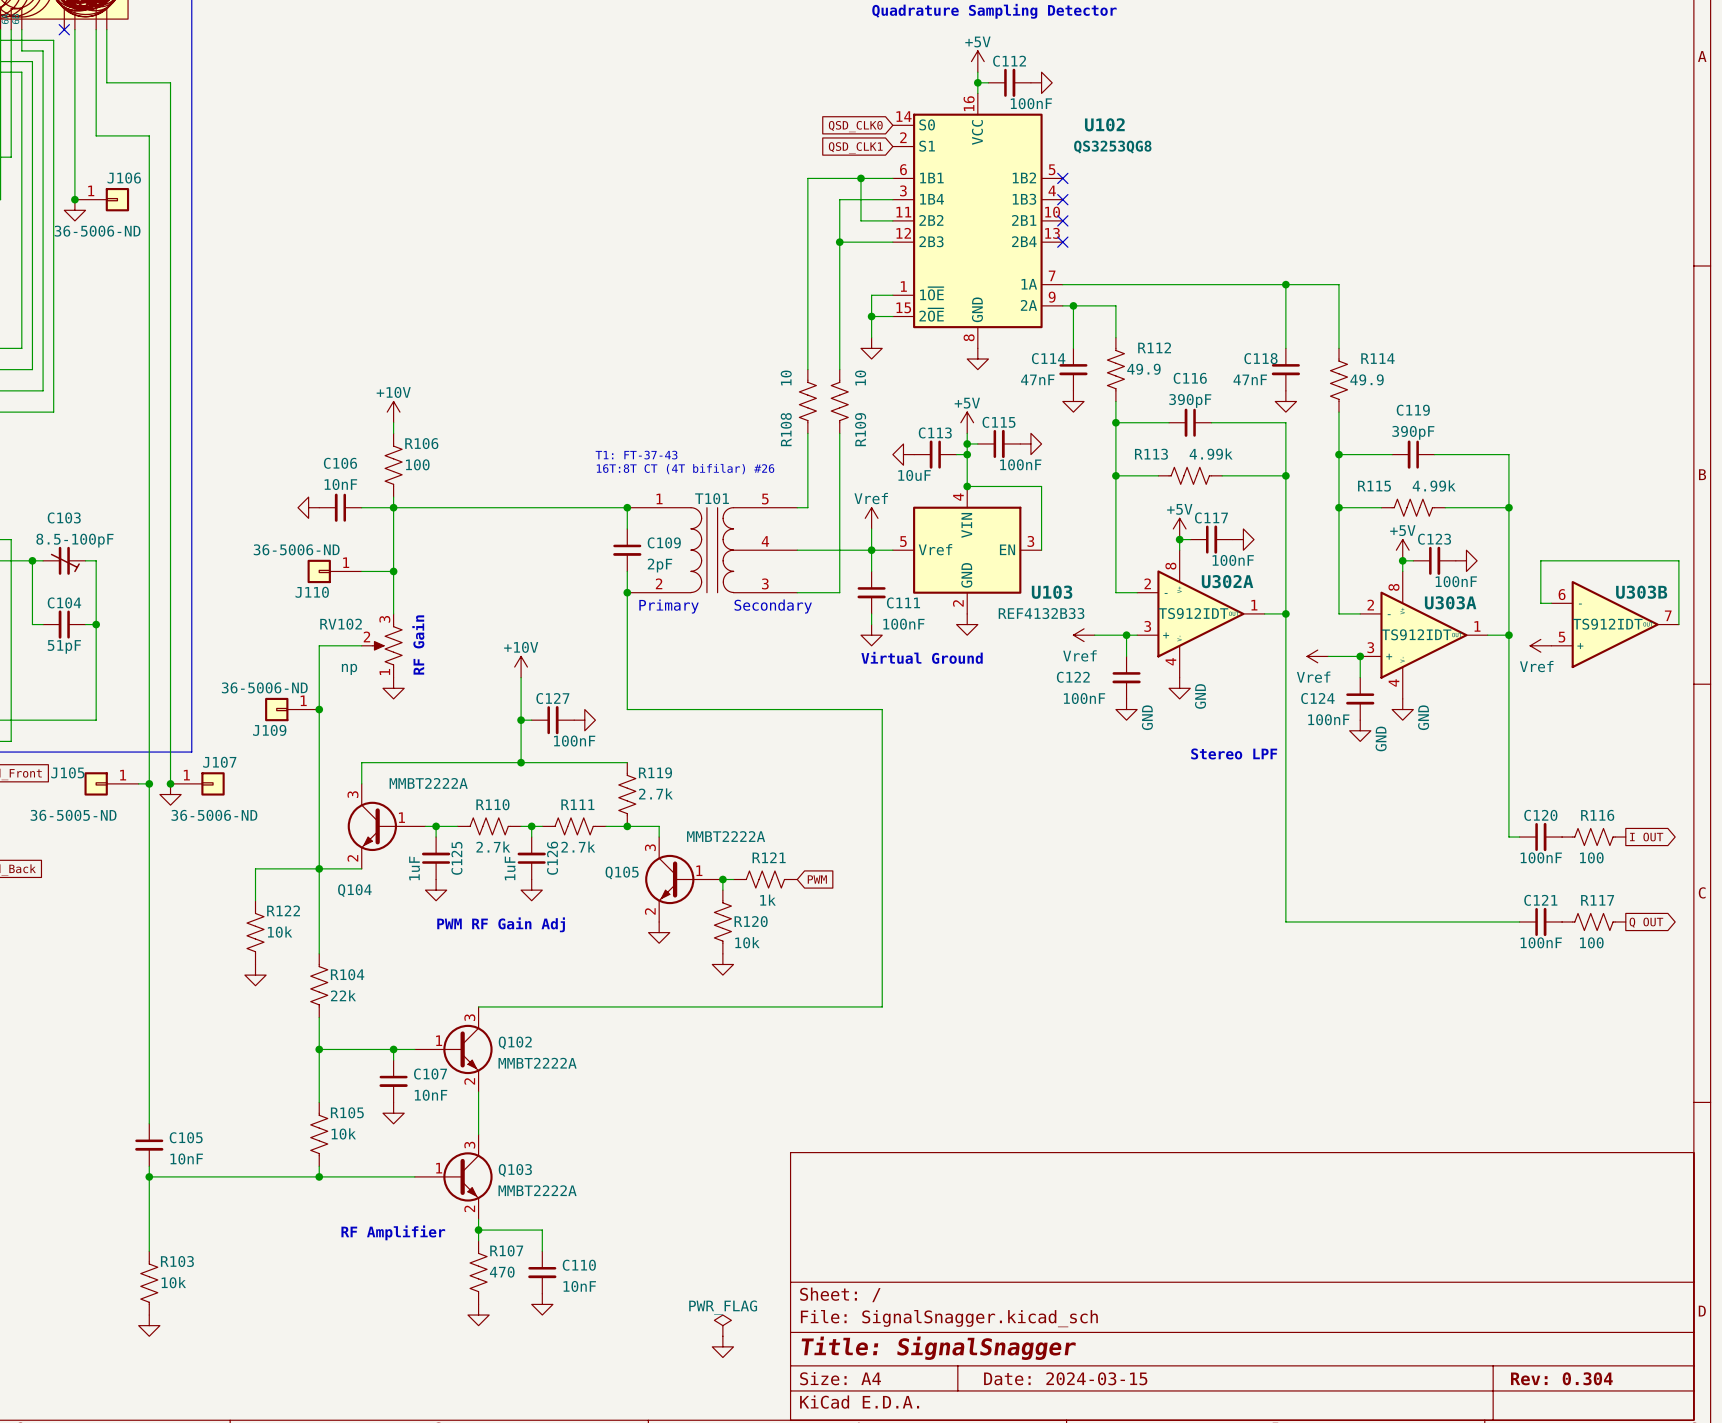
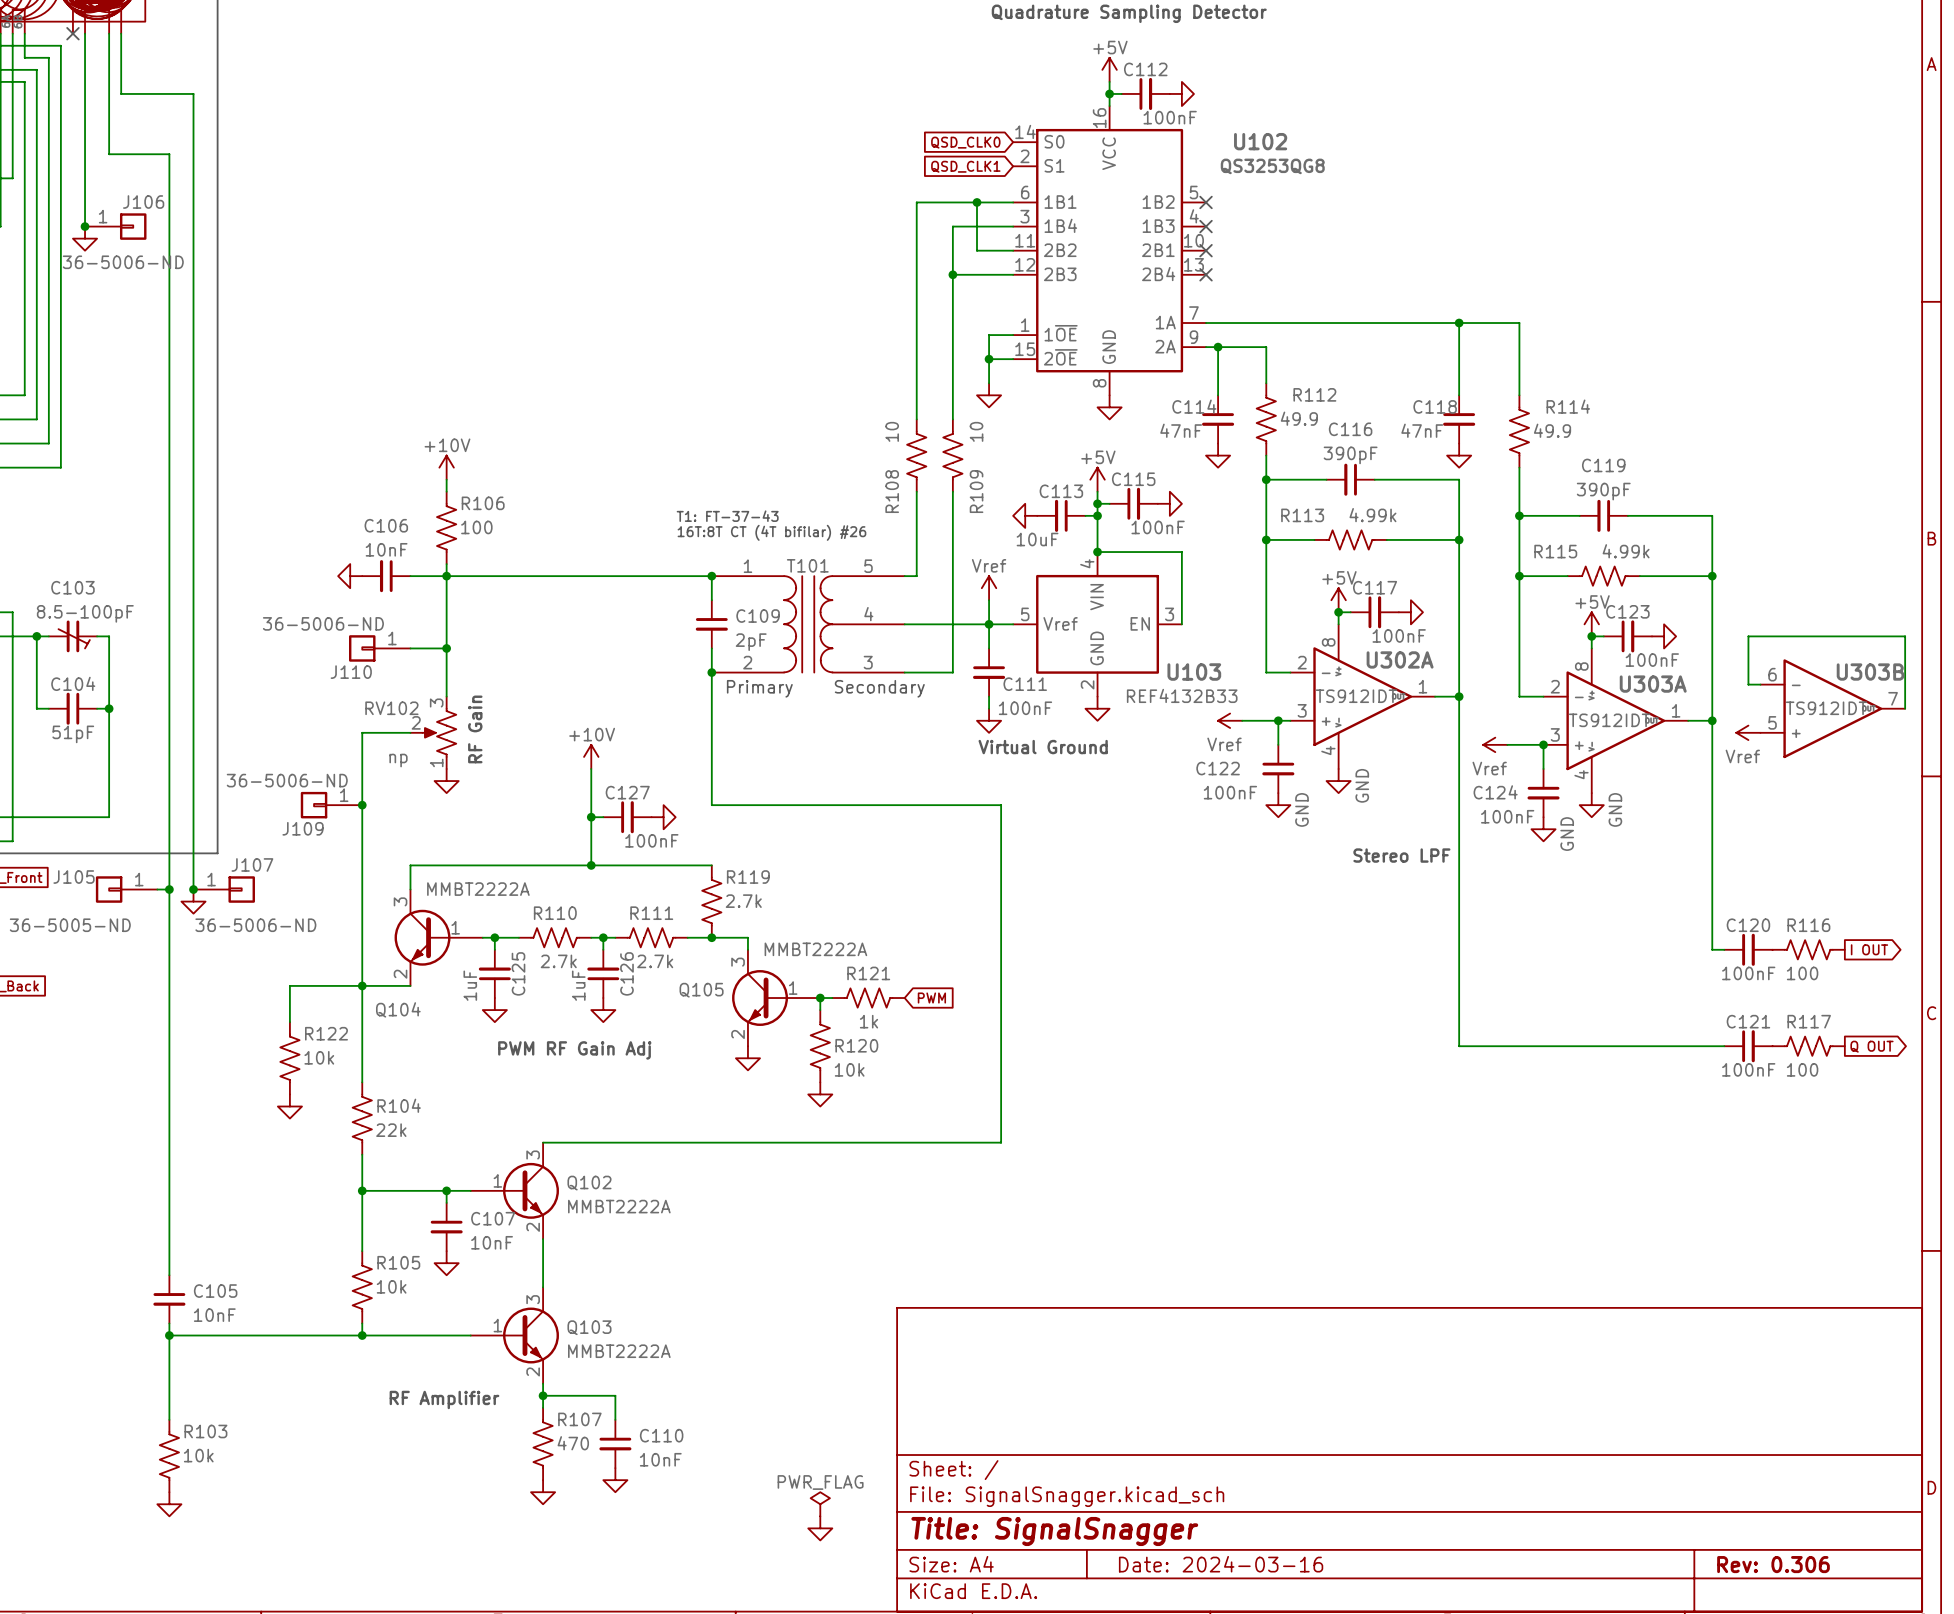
title block: Date: 2024-03-15 (1065, 1378) -> Date: 2024-03-16 (1221, 1564)
title block: Rev: 0.304 (1561, 1378) -> Rev: 0.306 (1773, 1564)

